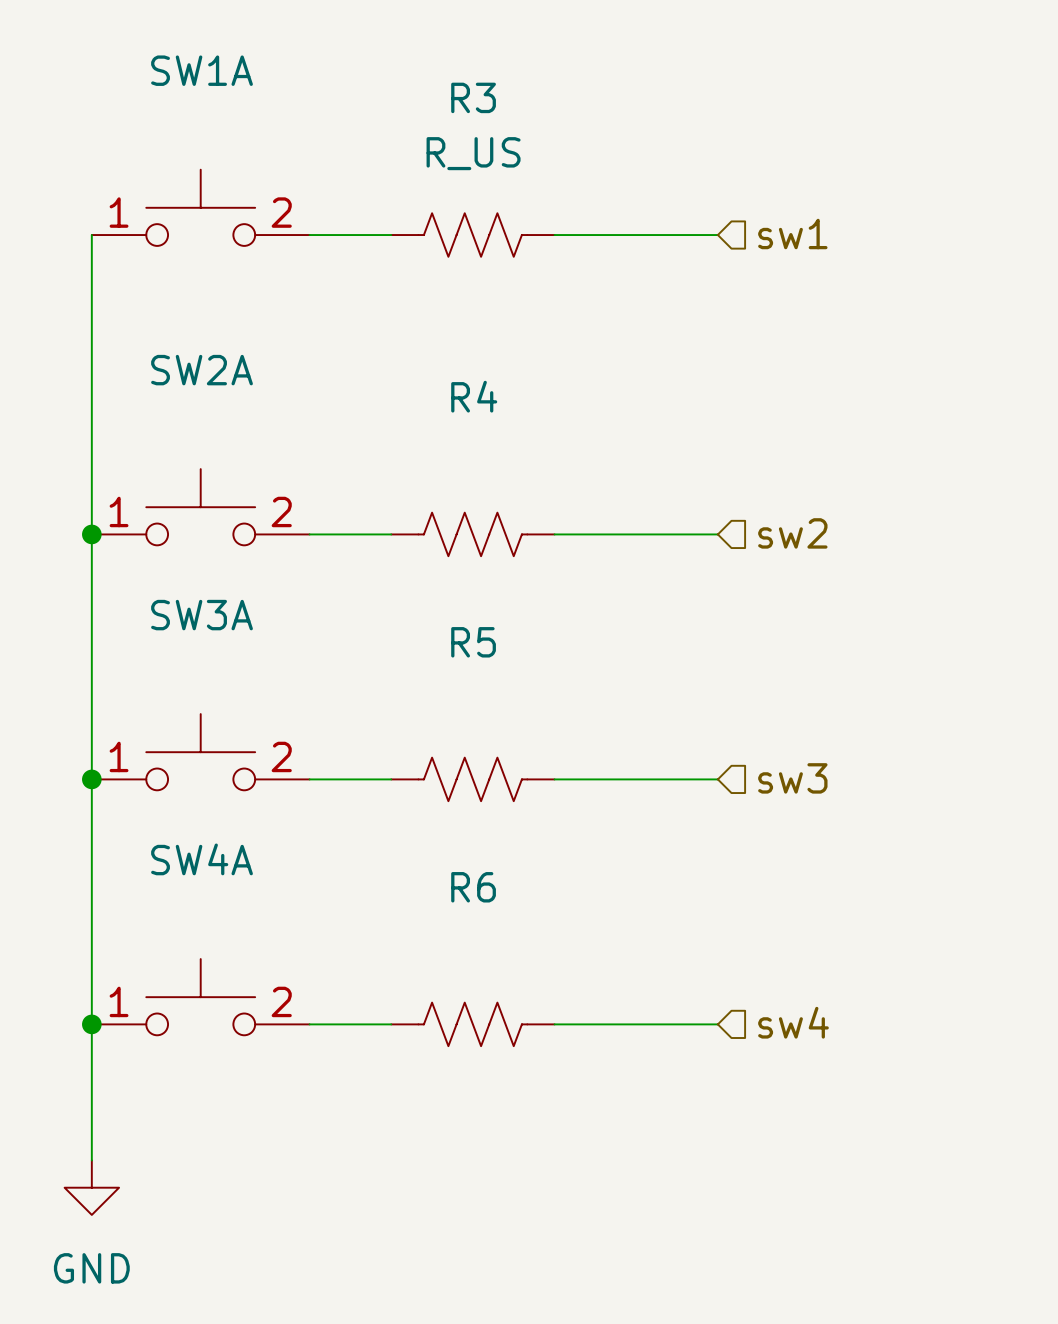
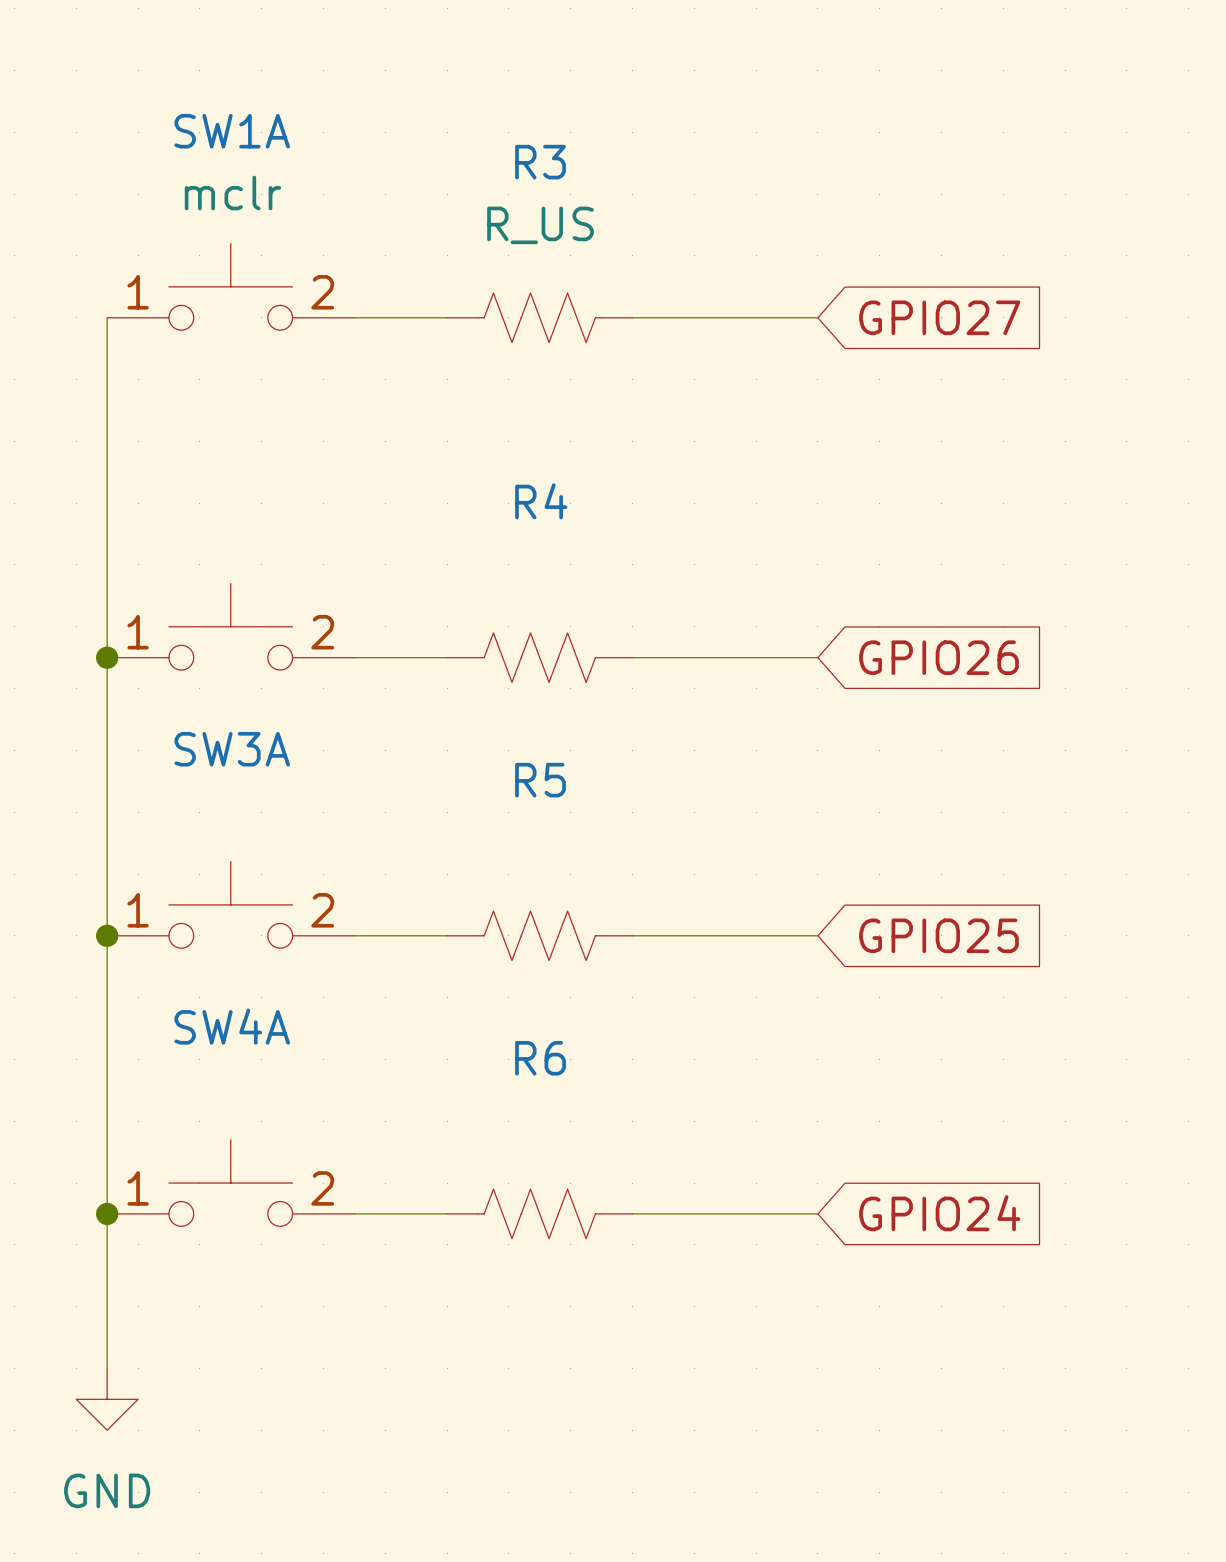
SW1A value: none -> mclr (232, 193)
hierarchical label: sw1 (792, 234) -> none
global label: none -> GPIO27 (939, 317)
SW2A name: SW2A (202, 370) -> none
hierarchical label: sw2 (792, 533) -> none
global label: none -> GPIO26 (938, 657)
hierarchical label: sw3 (792, 778) -> none
global label: none -> GPIO25 (938, 935)
hierarchical label: sw4 (793, 1022) -> none
global label: none -> GPIO24 (939, 1213)

